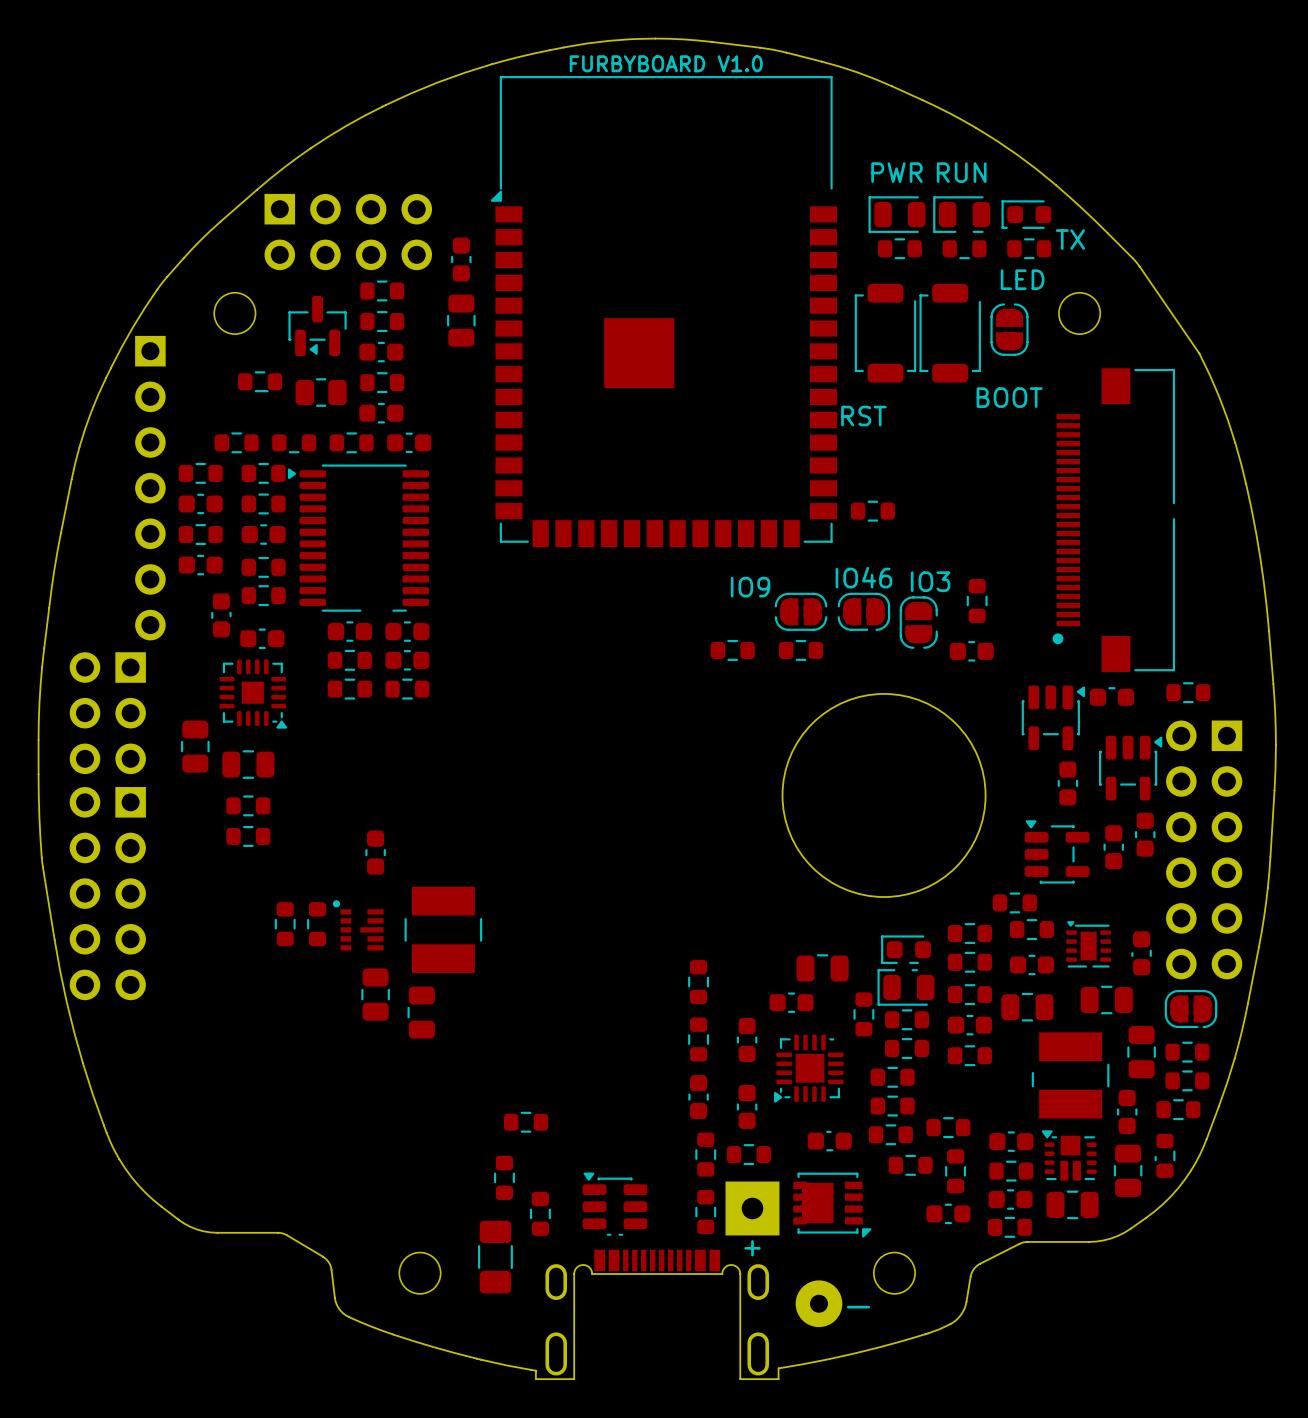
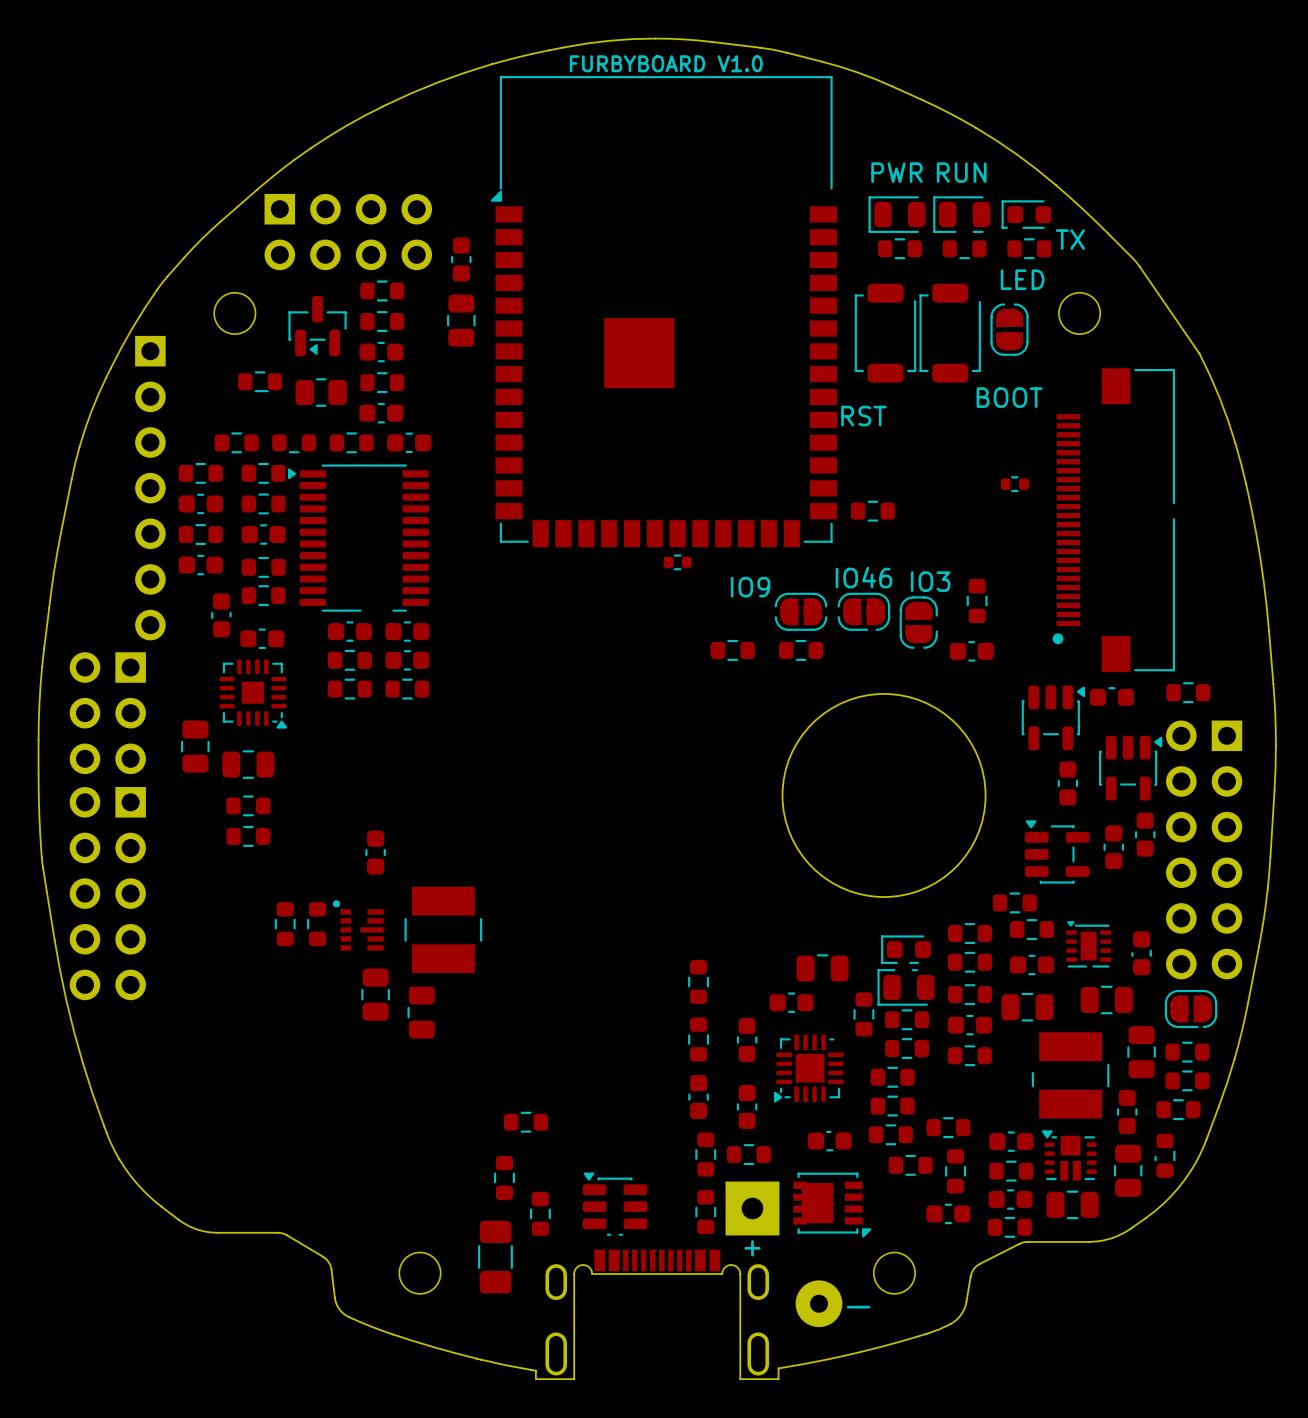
part: none -> (1014, 484)
part: none -> (677, 562)

